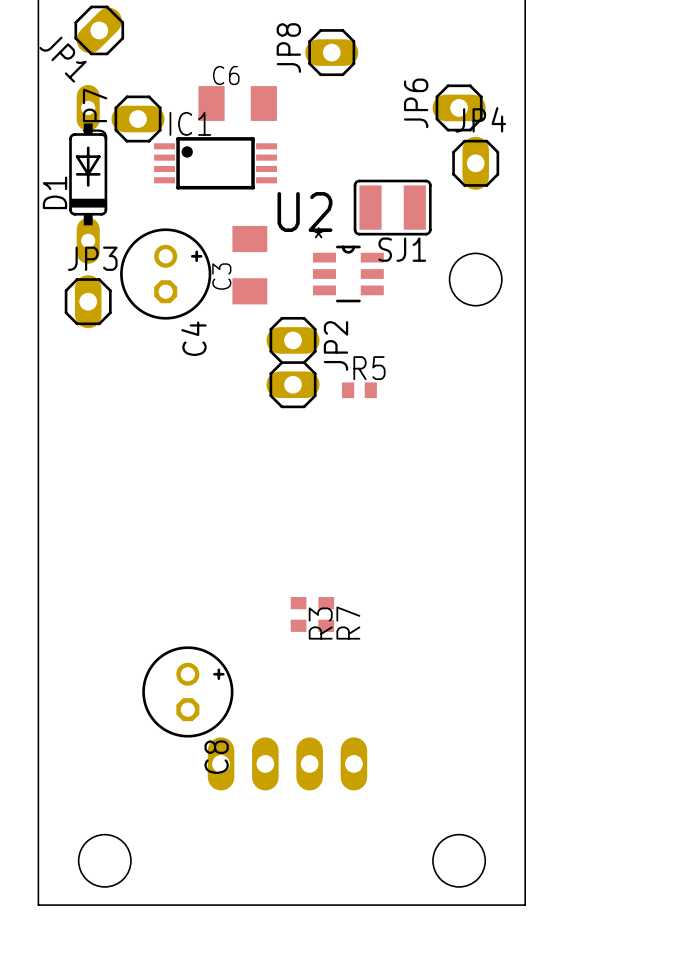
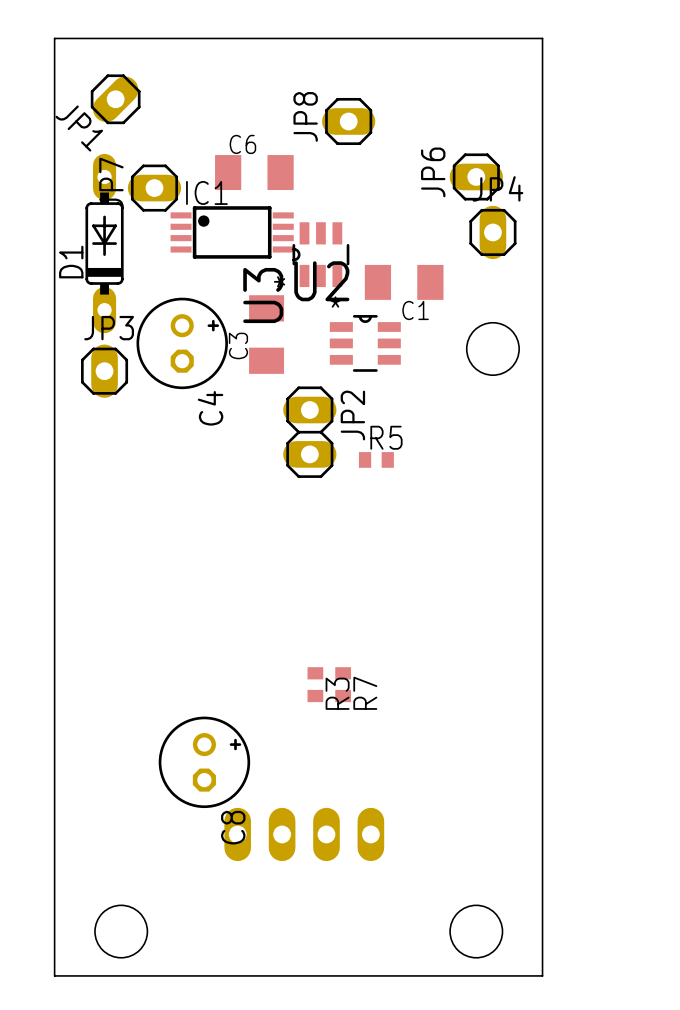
U3: none -> (320, 254)
SJ1: (392, 207) -> none
C1: none -> (404, 282)

